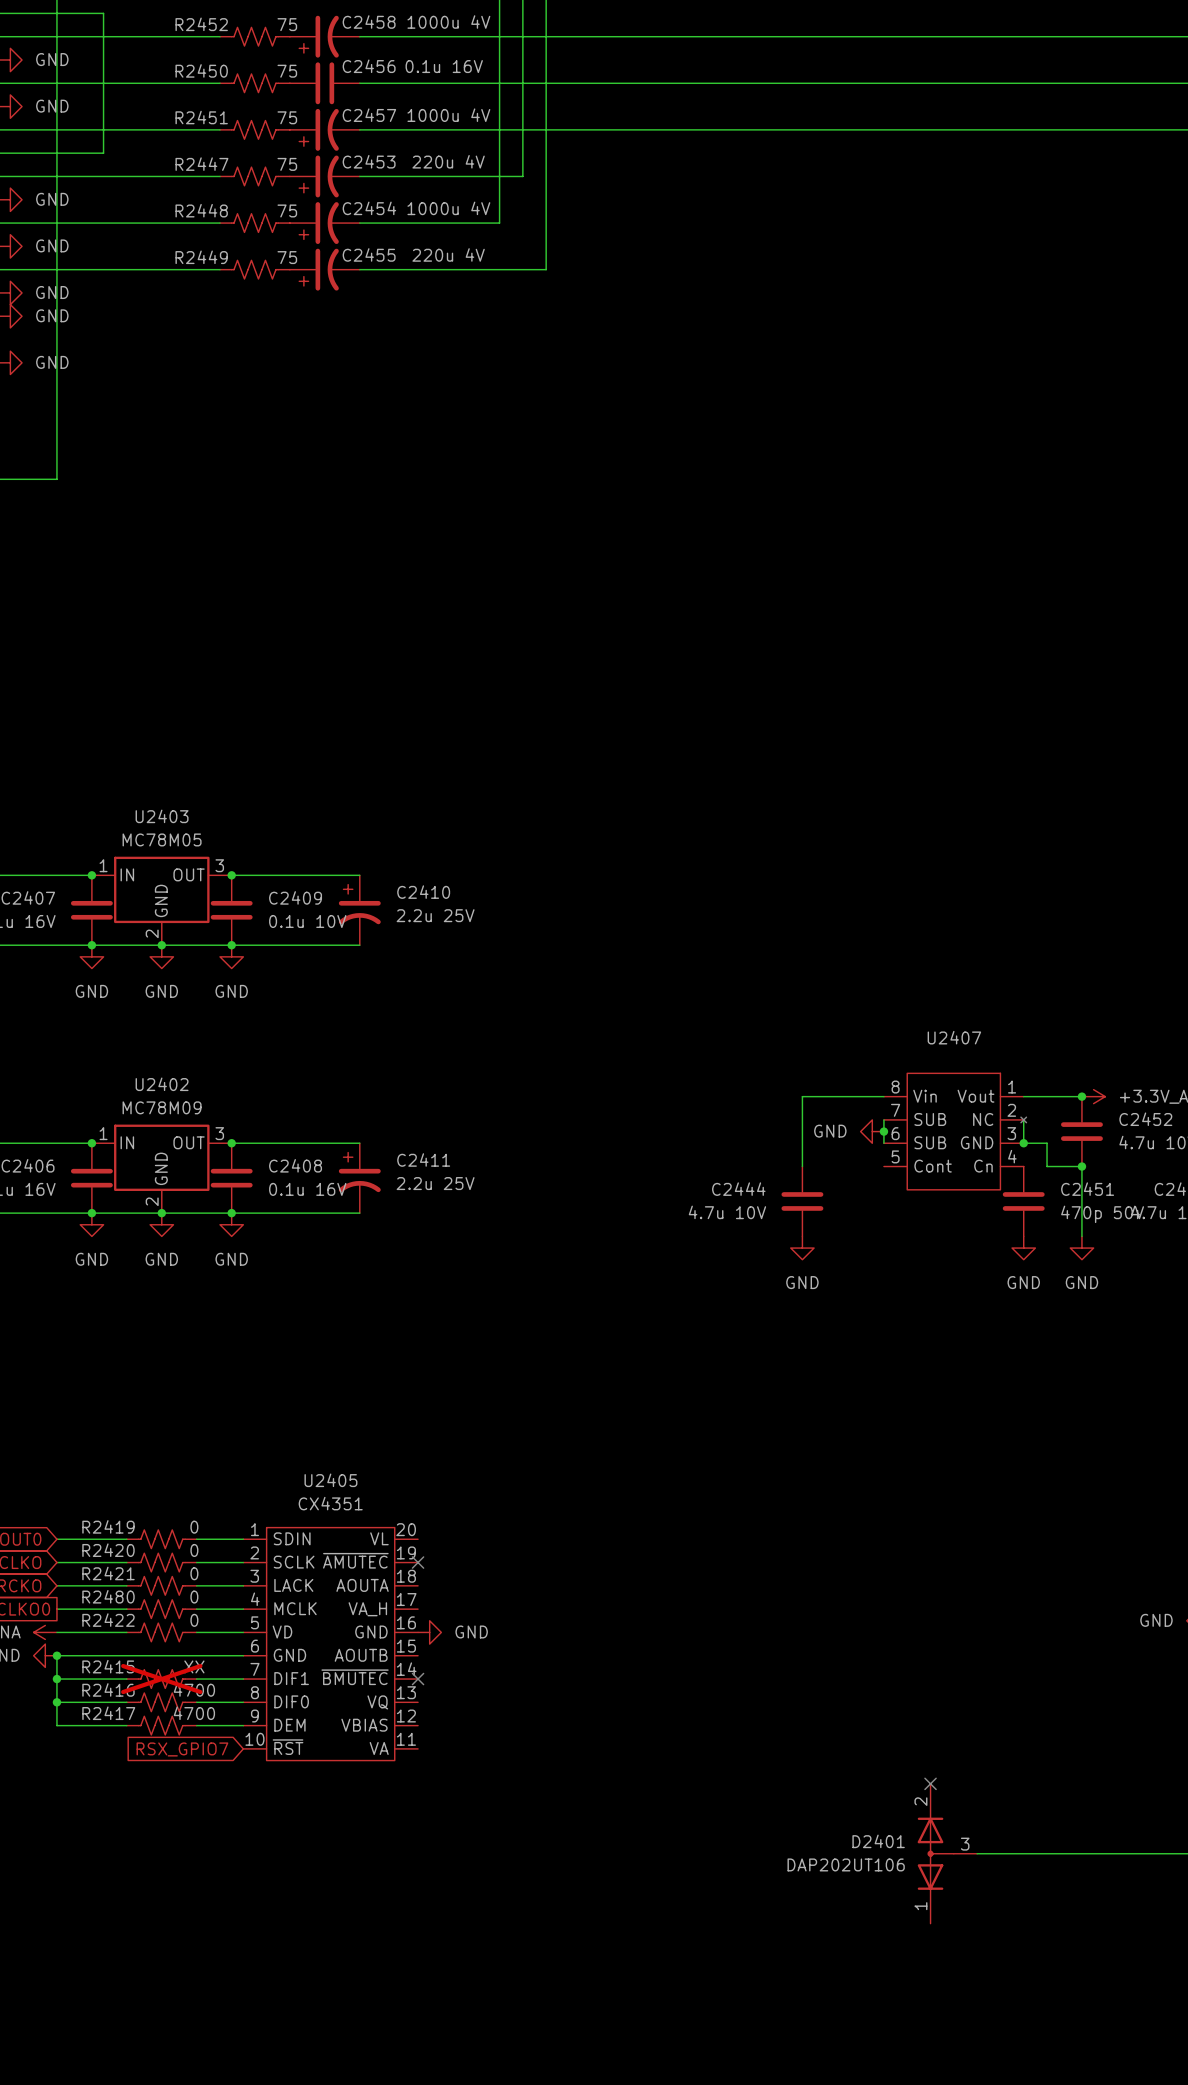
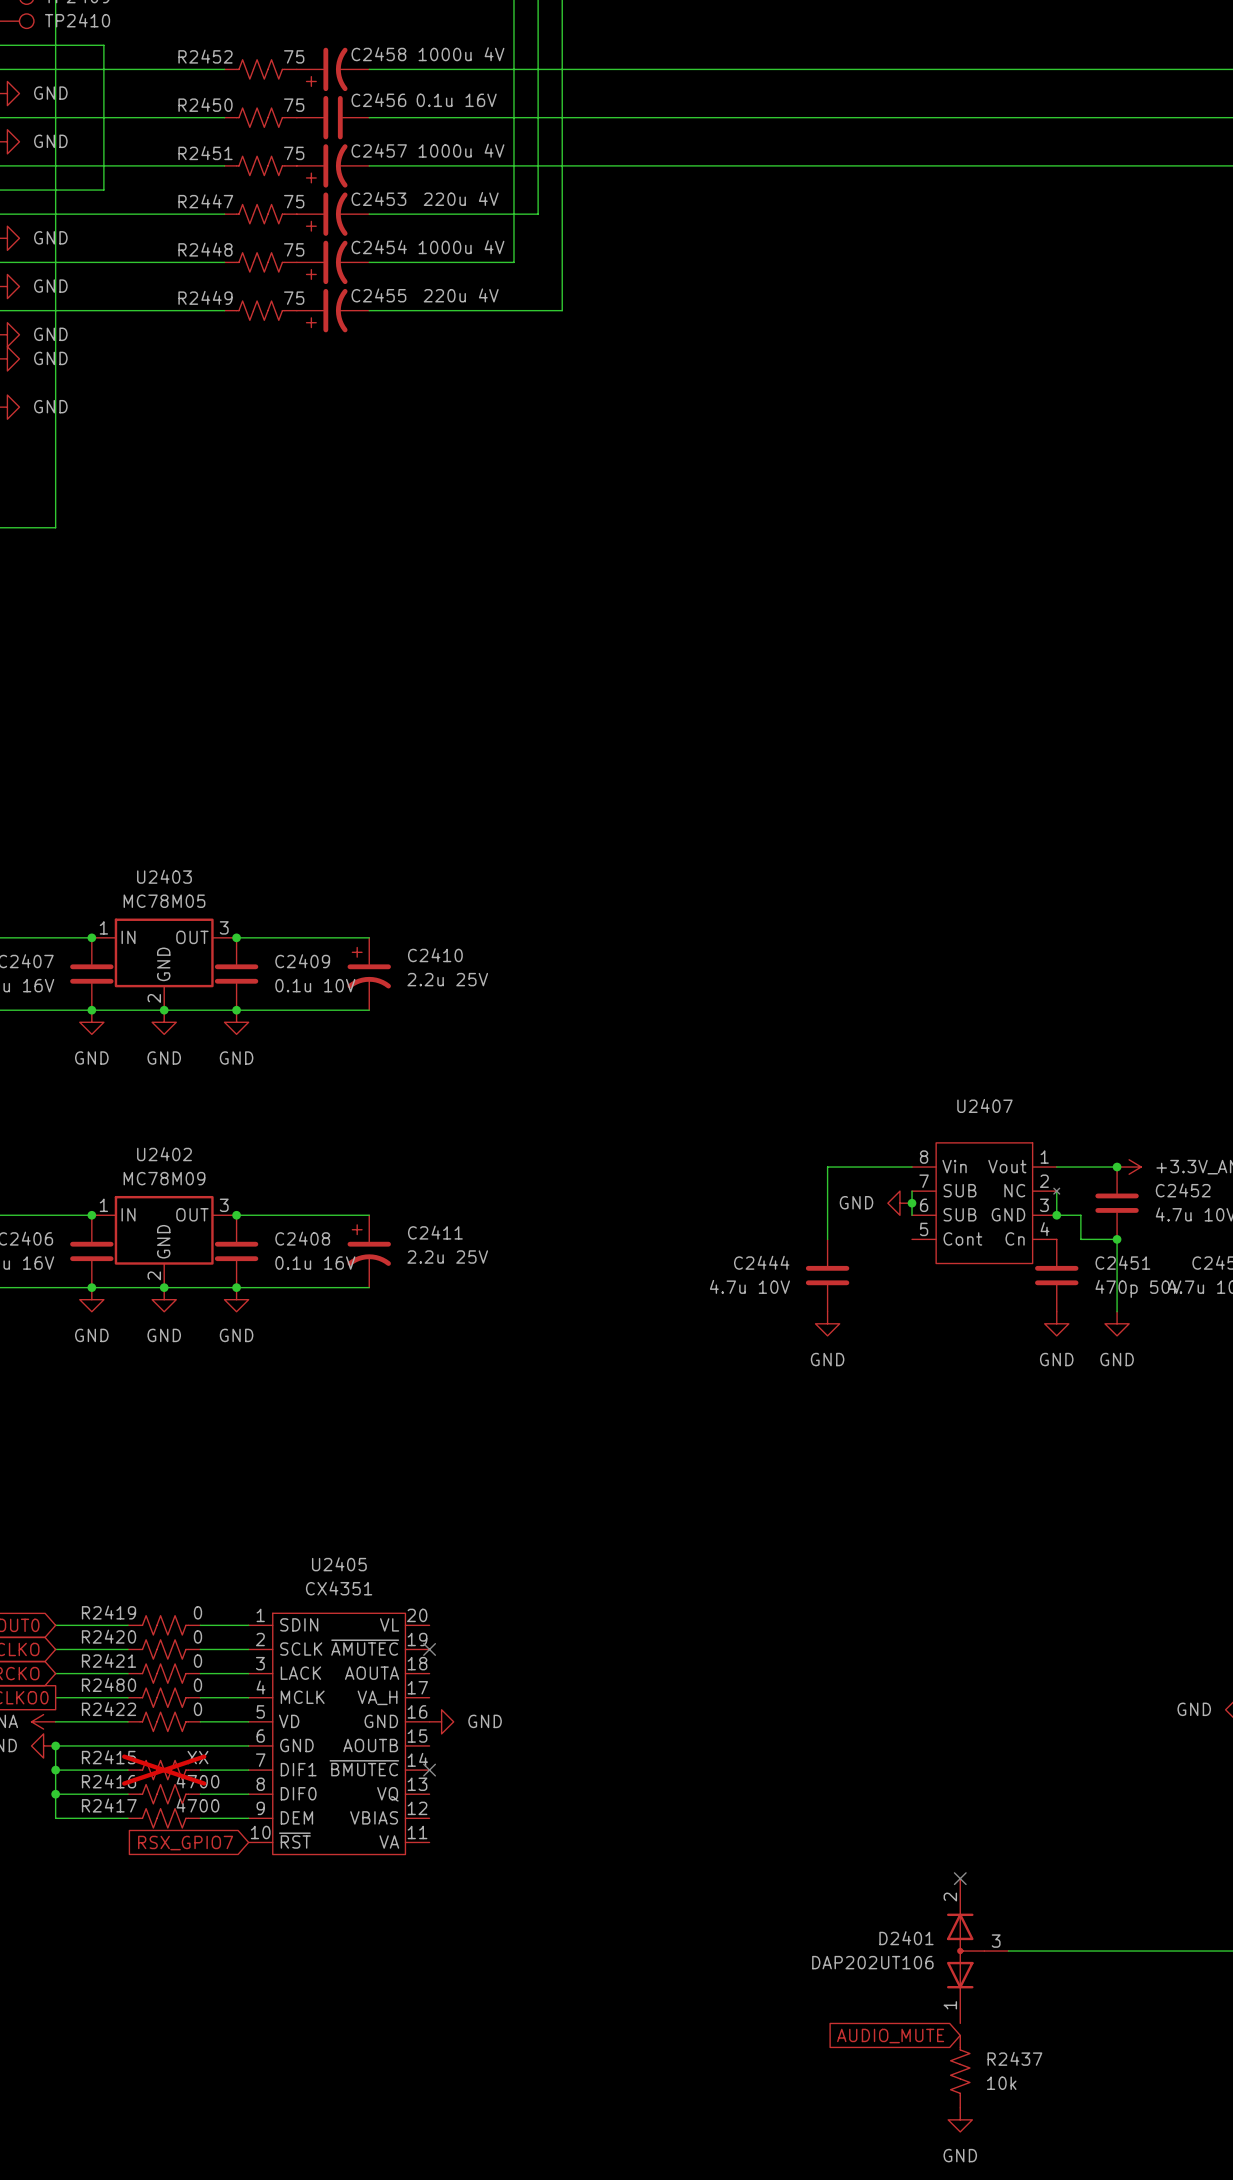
global label: none -> AUDIO_MUTE (890, 2036)
R2437: none -> 10k (960, 2071)
power symbol: none -> GND (960, 2119)

